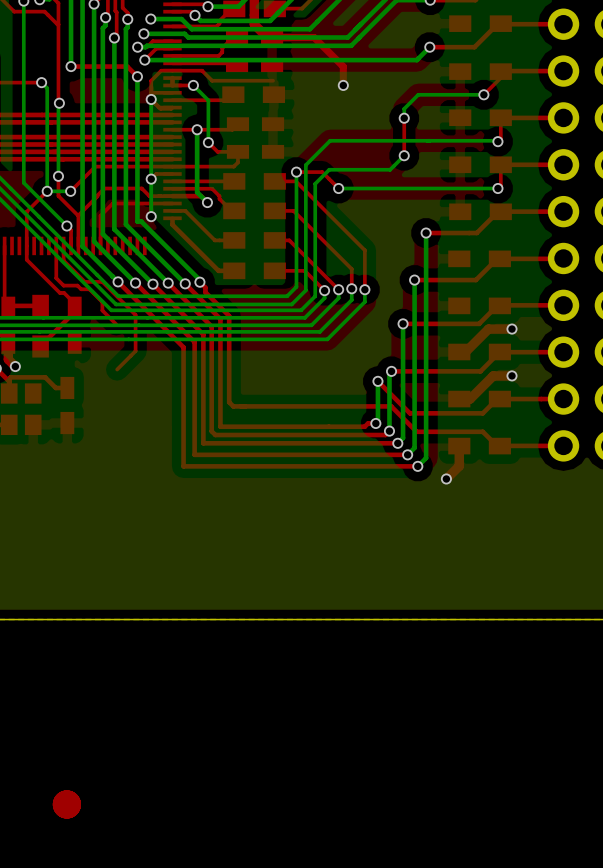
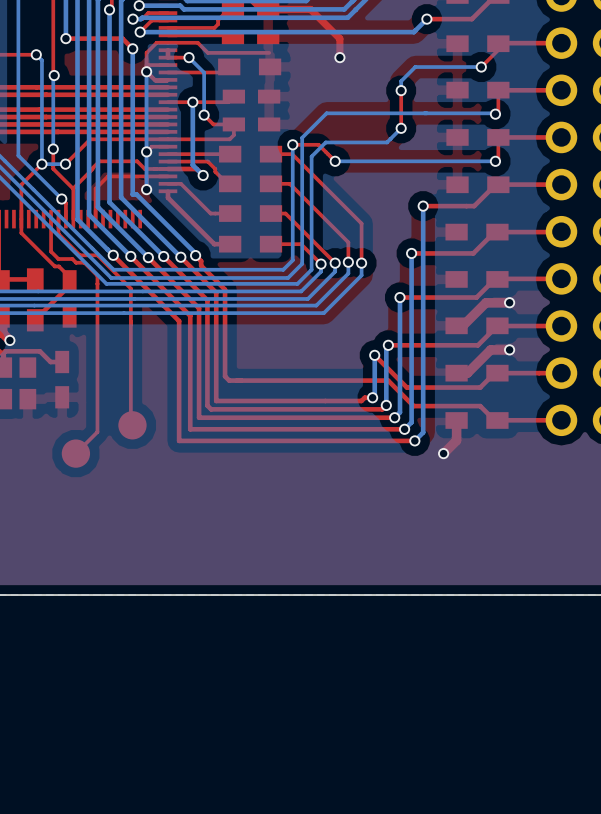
top track: (102, 310) (116, 324) -> (97, 284) (97, 432) (75, 453)
top track: (135, 351) (117, 369) -> (130, 324) (130, 417) (123, 425)
part: none -> (132, 425)
part: none -> (75, 453)
part: (66, 804) -> none

